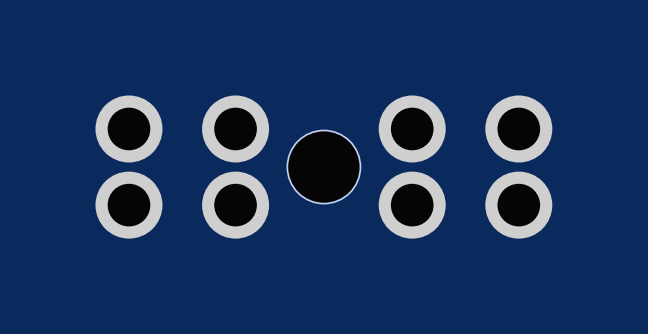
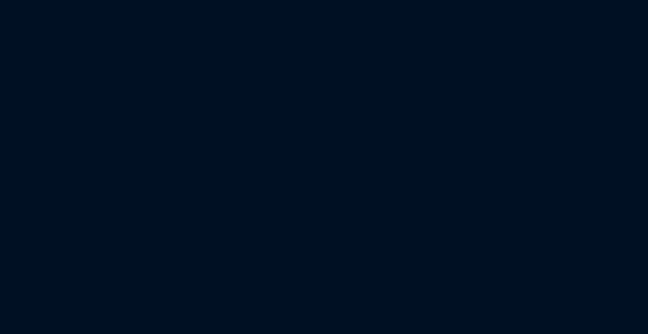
part: (323, 167) -> none

